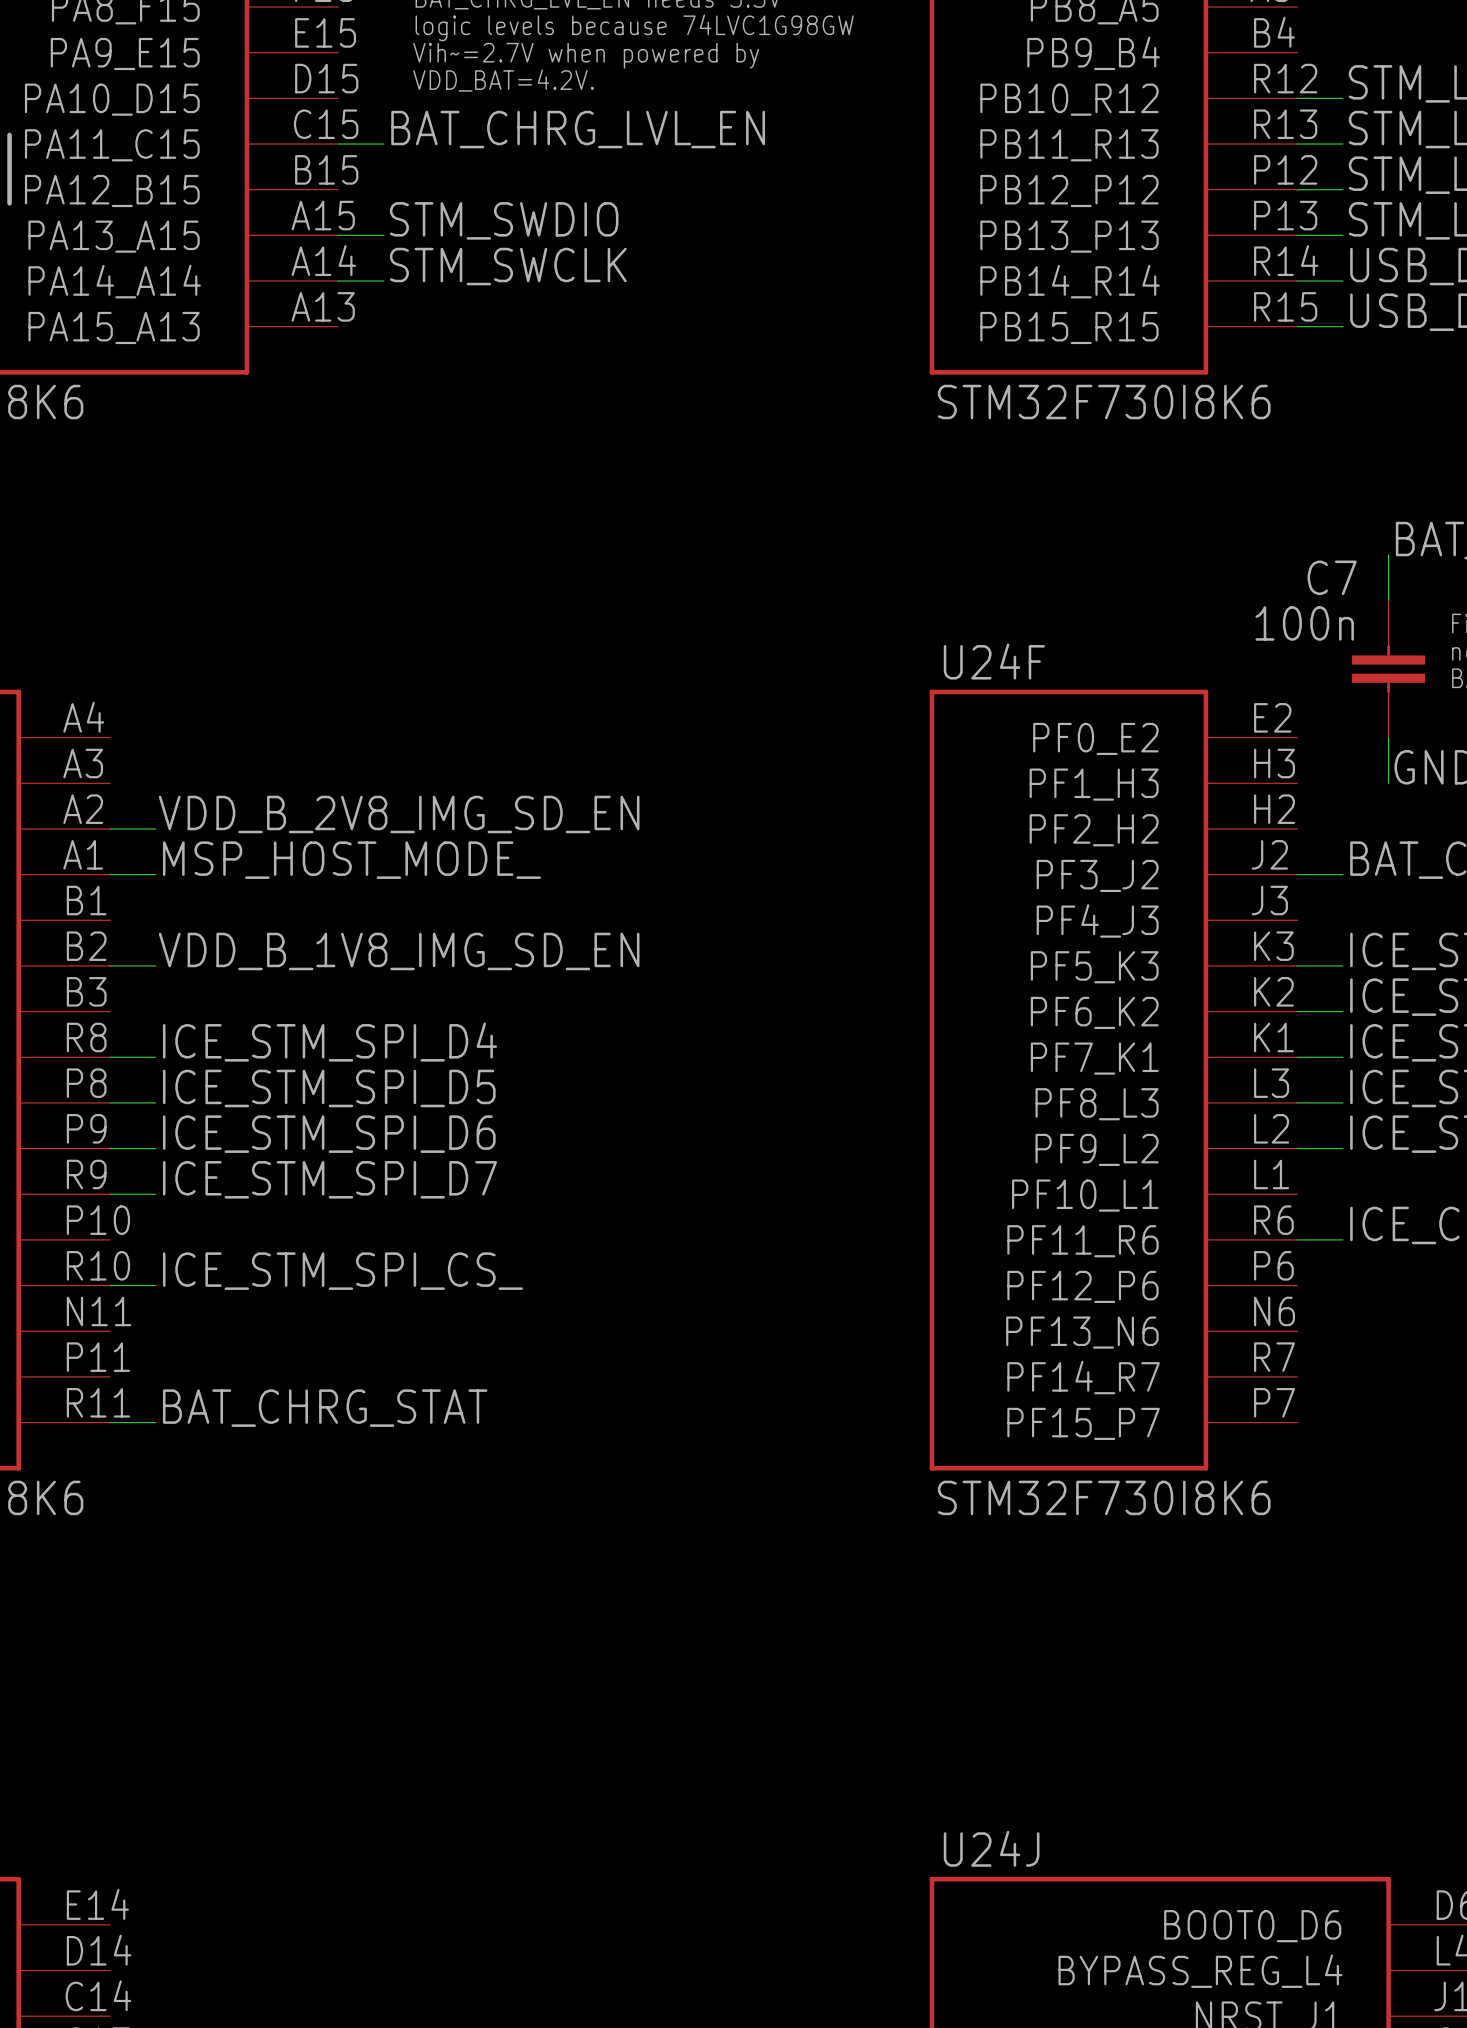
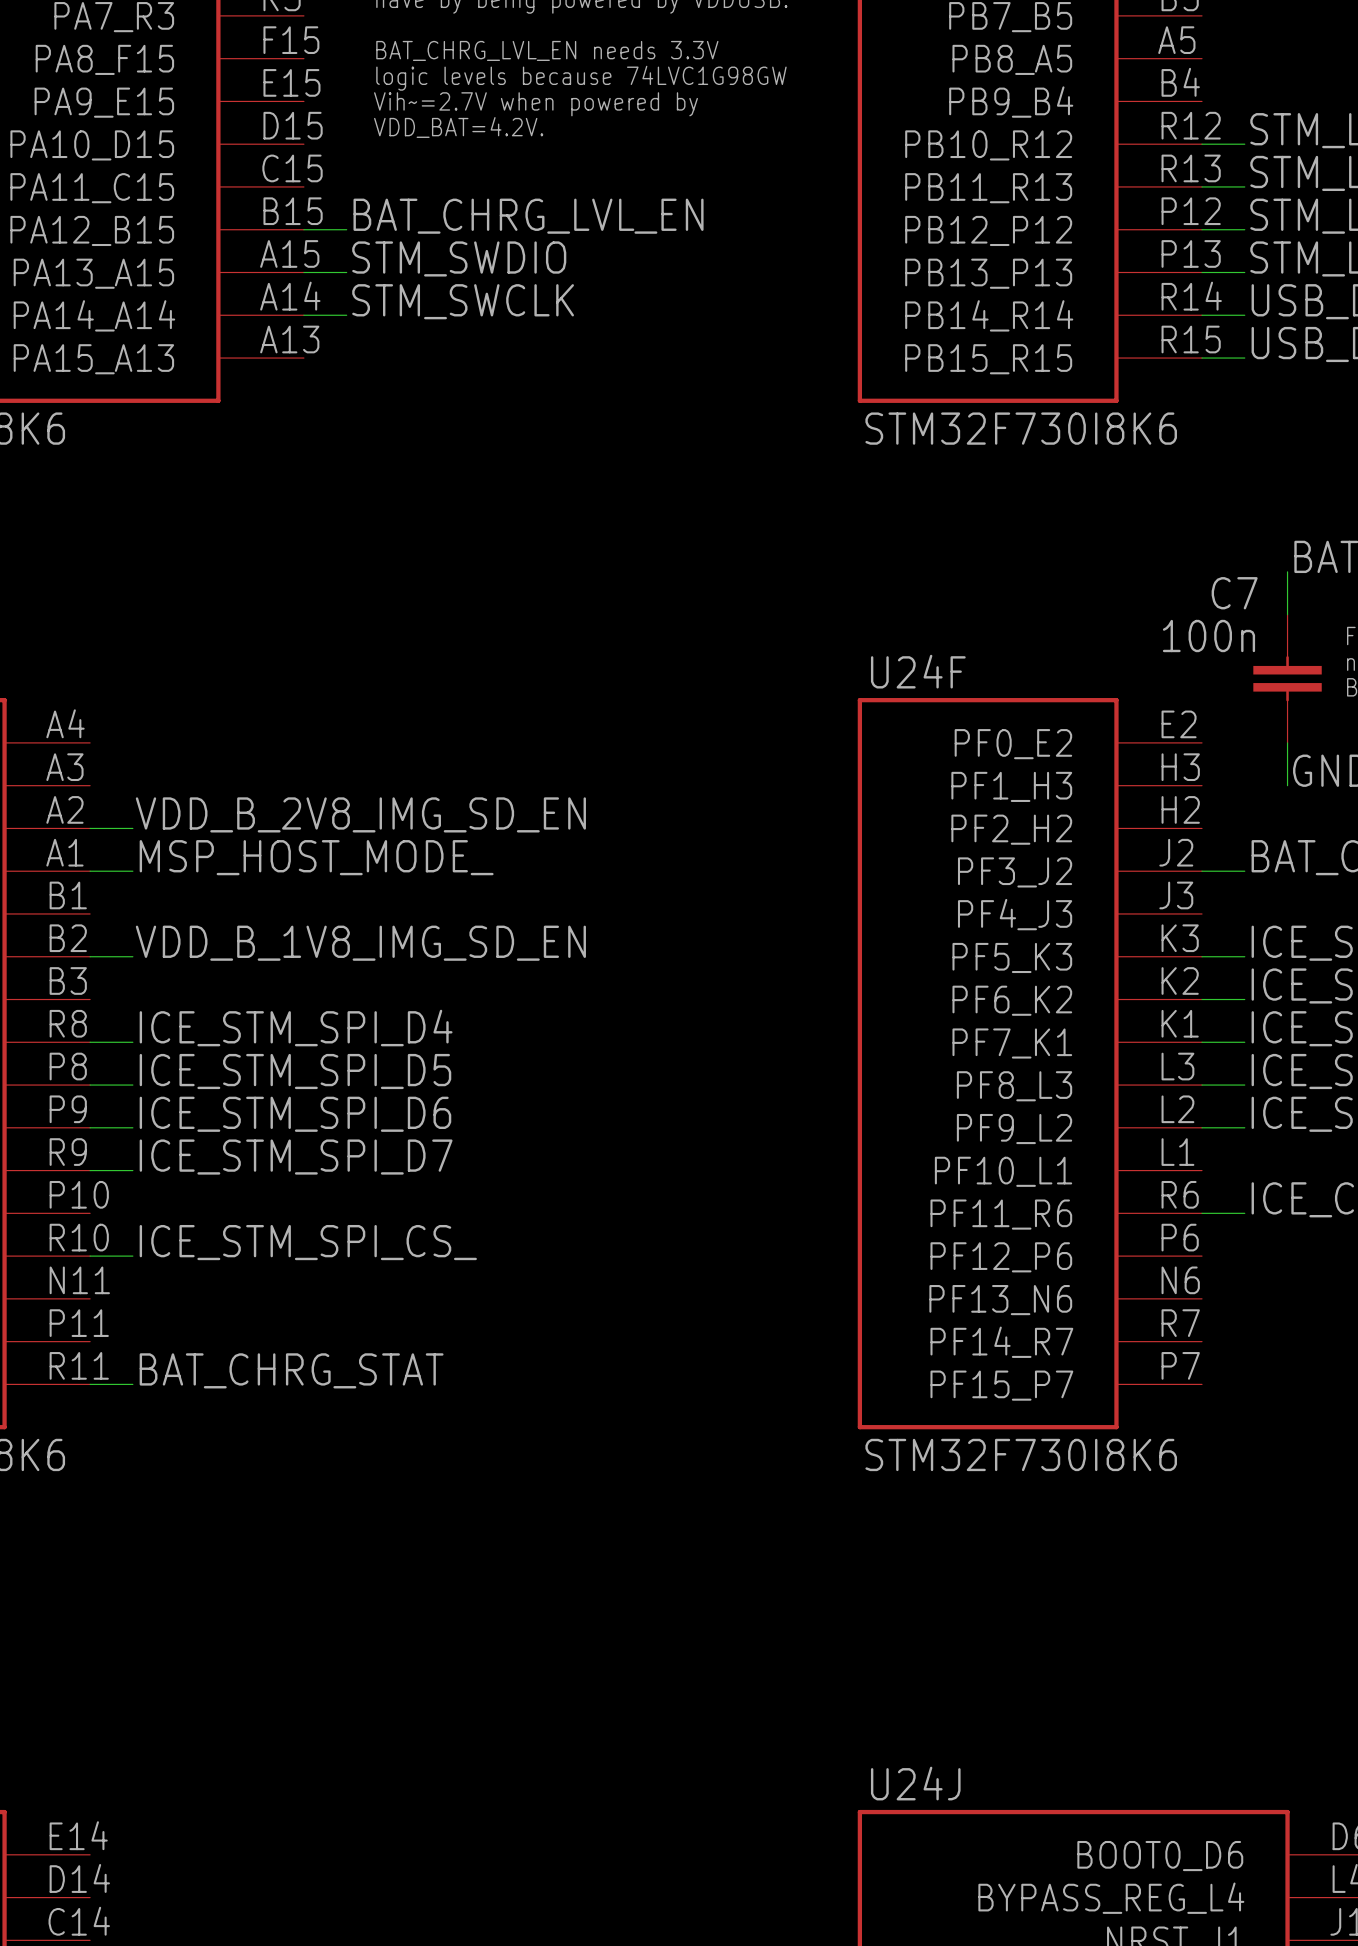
label position: BAT_CHRG_LVL_EN (578, 129) -> BAT_CHRG_LVL_EN (528, 216)
wire: (338, 144) (384, 144) -> (303, 229) (346, 229)

